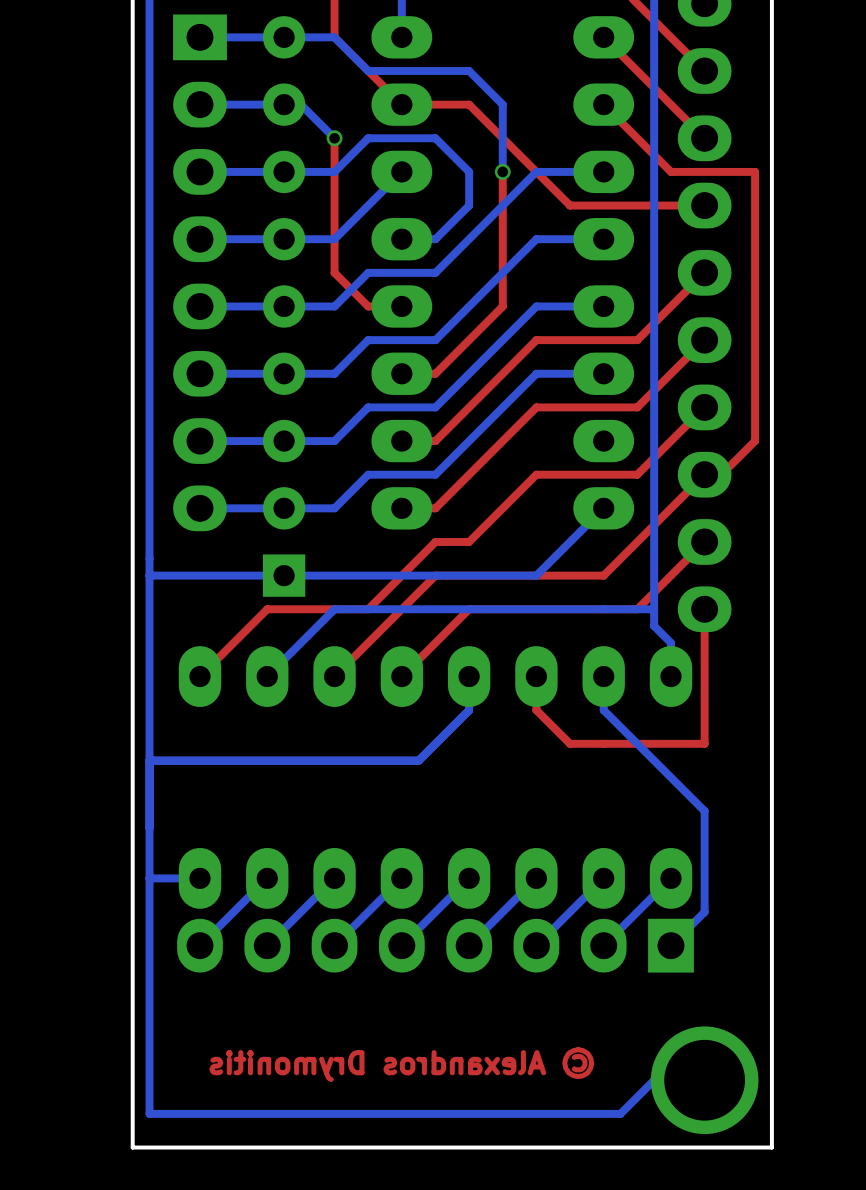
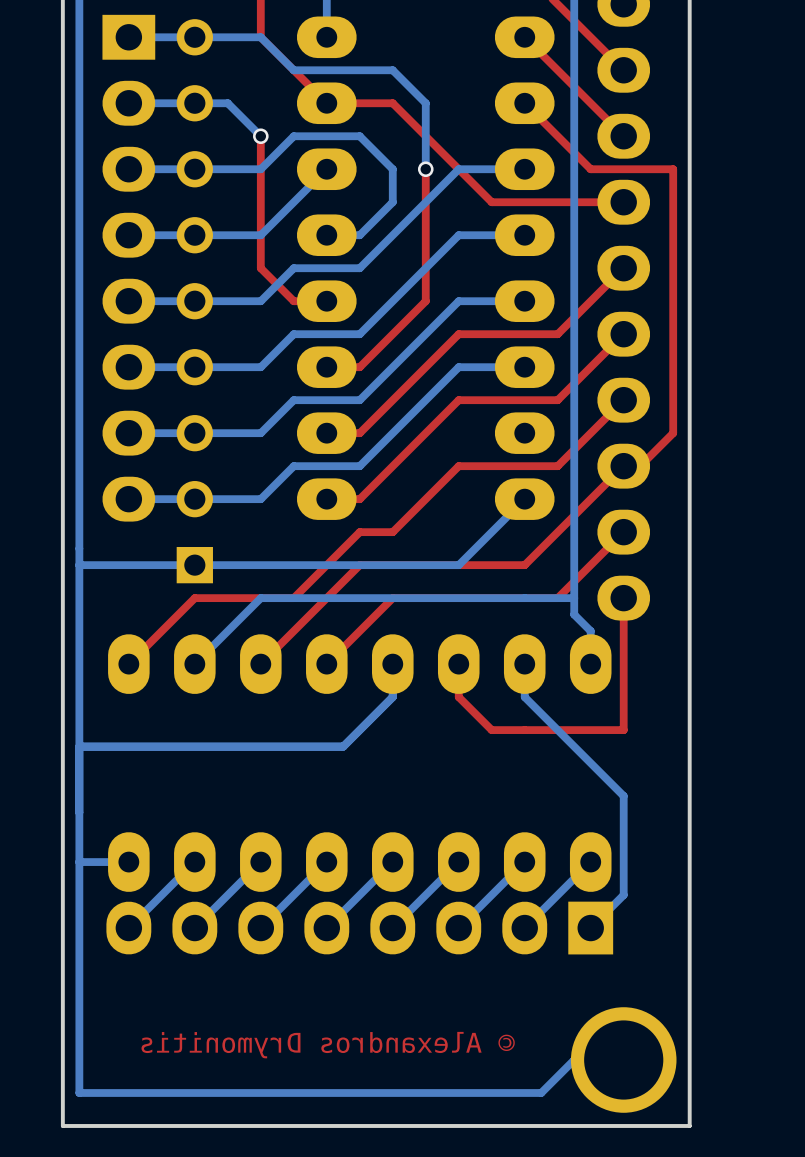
part footprint: [262, 16, 306, 597] -> [176, 19, 213, 584]

